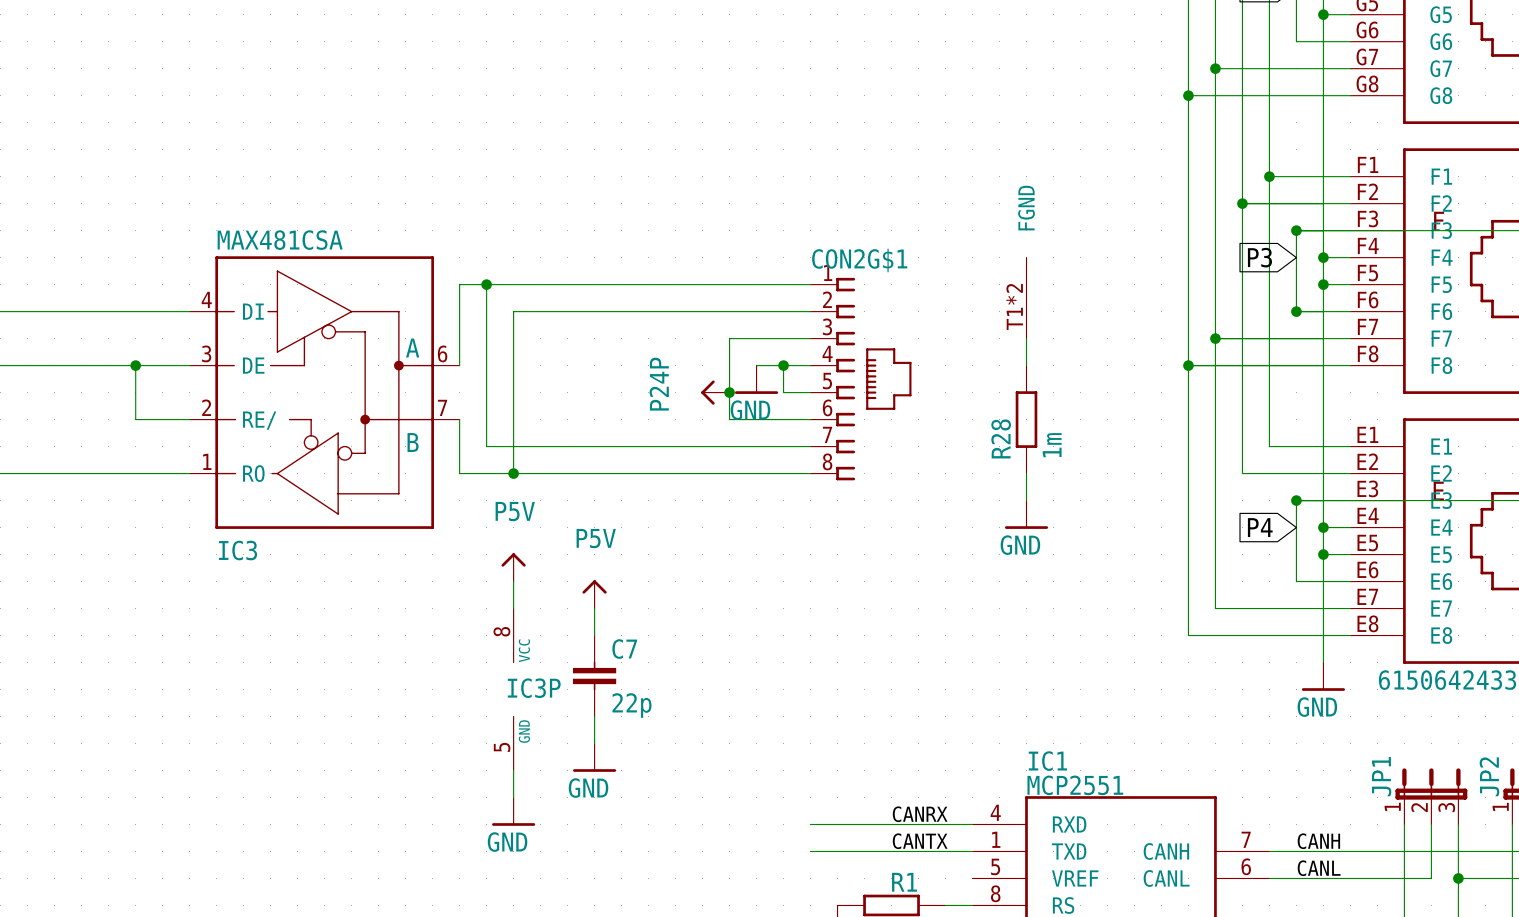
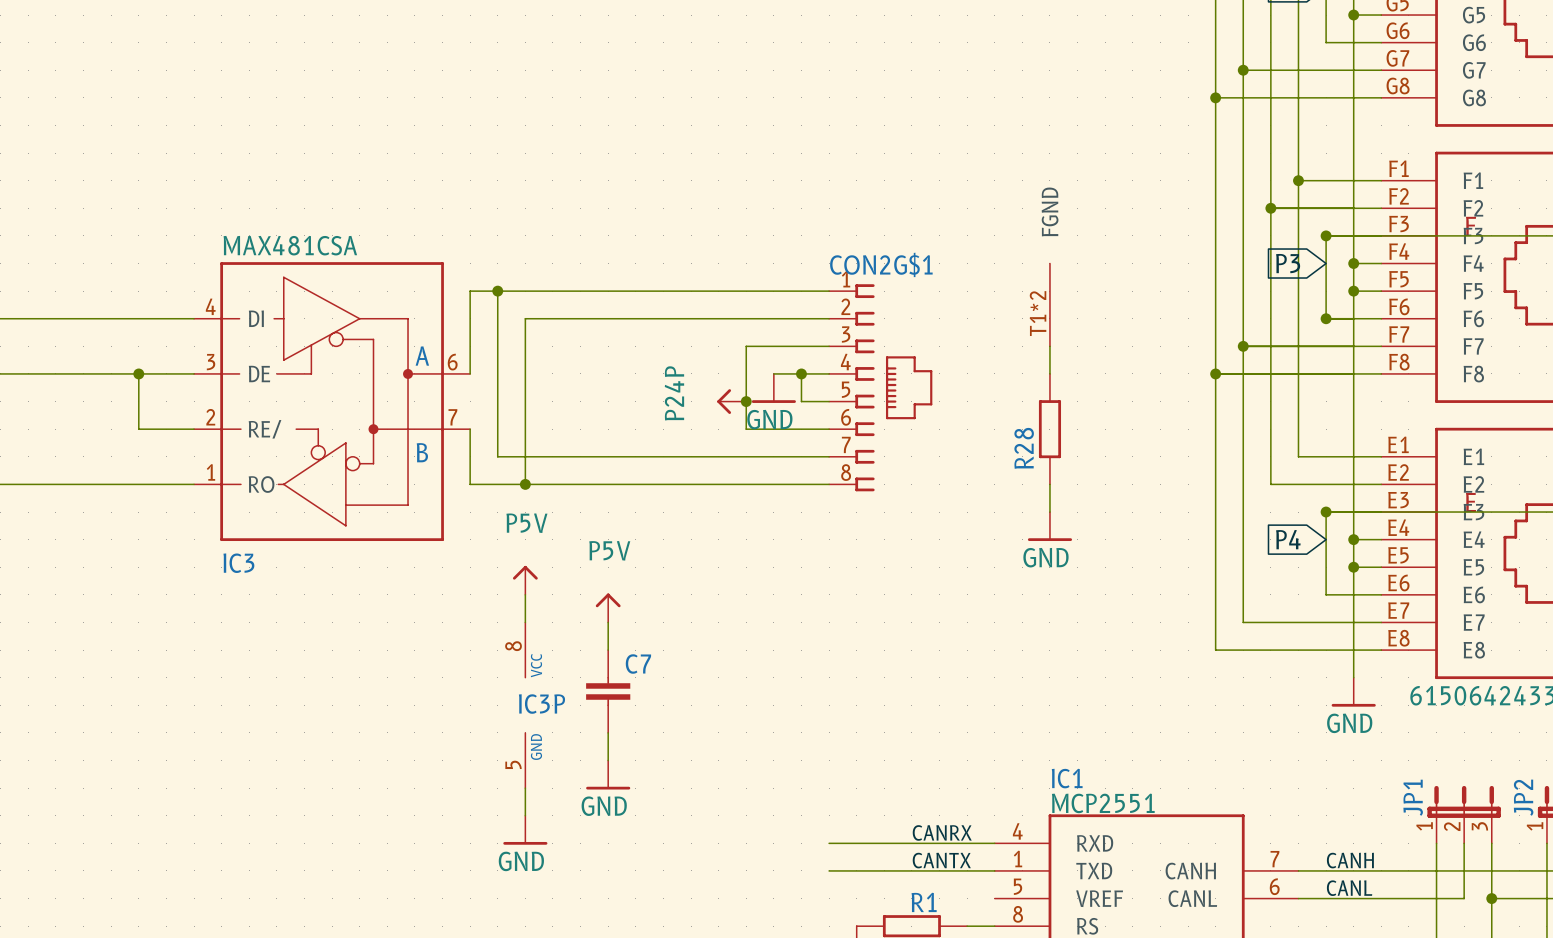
R28 value: 1m (1052, 445) -> none
C7 value: 22p (632, 705) -> none

